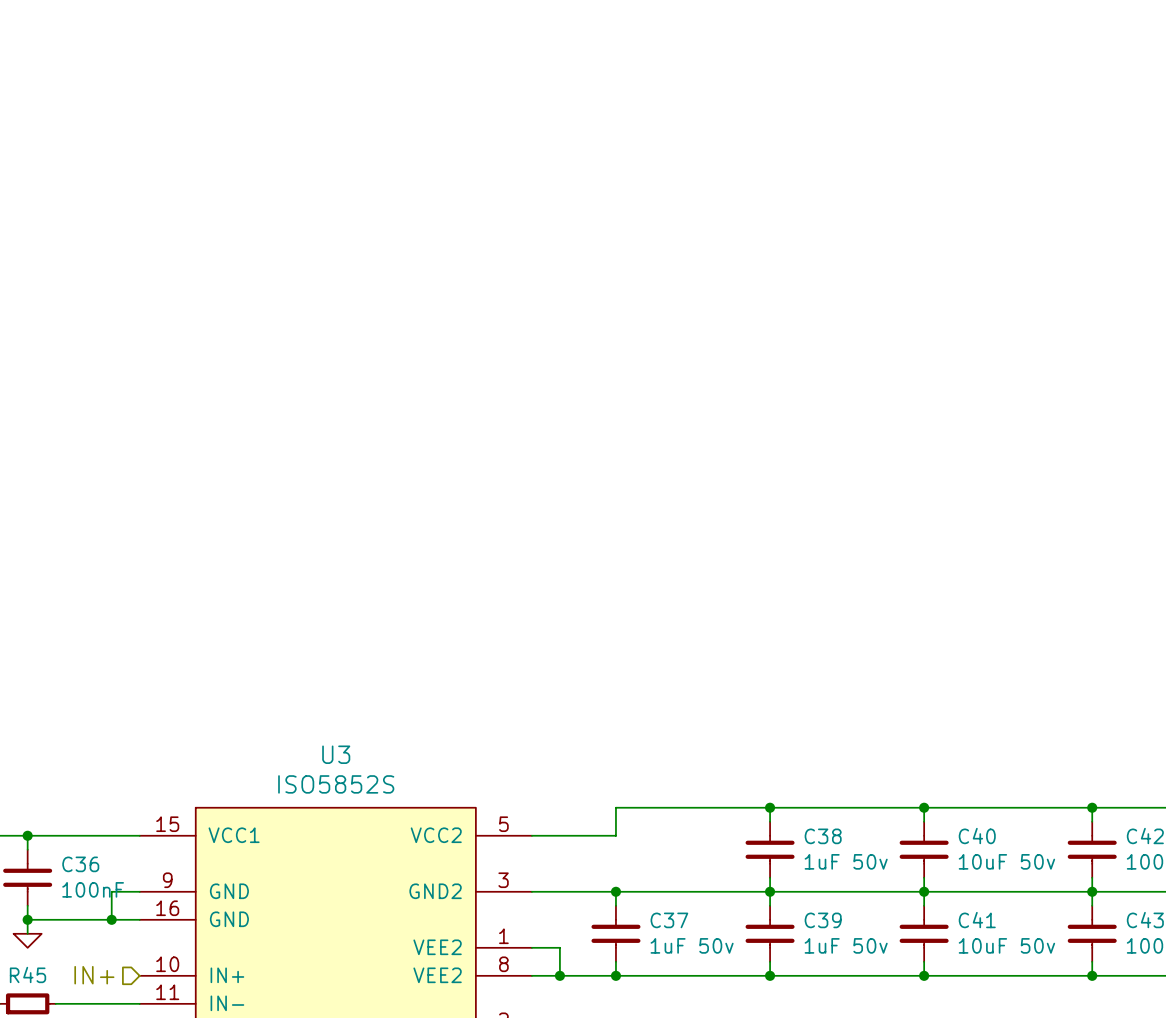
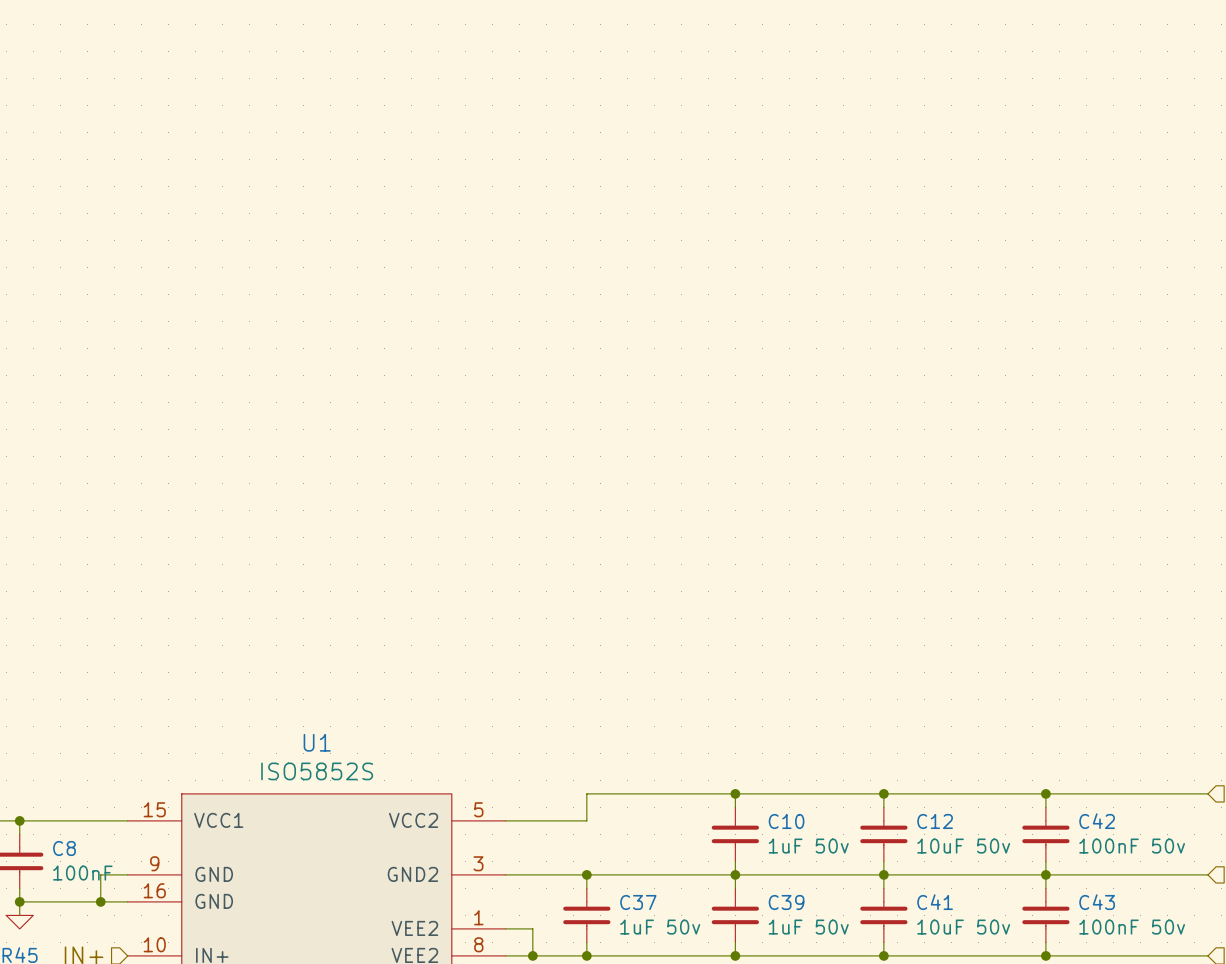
U3 name: U3 (336, 754) -> U1 (317, 742)
C38 name: C38 (823, 836) -> C10 (786, 821)
C40 name: C40 (977, 836) -> C12 (935, 821)
C36 name: C36 (80, 864) -> C8 (64, 848)

